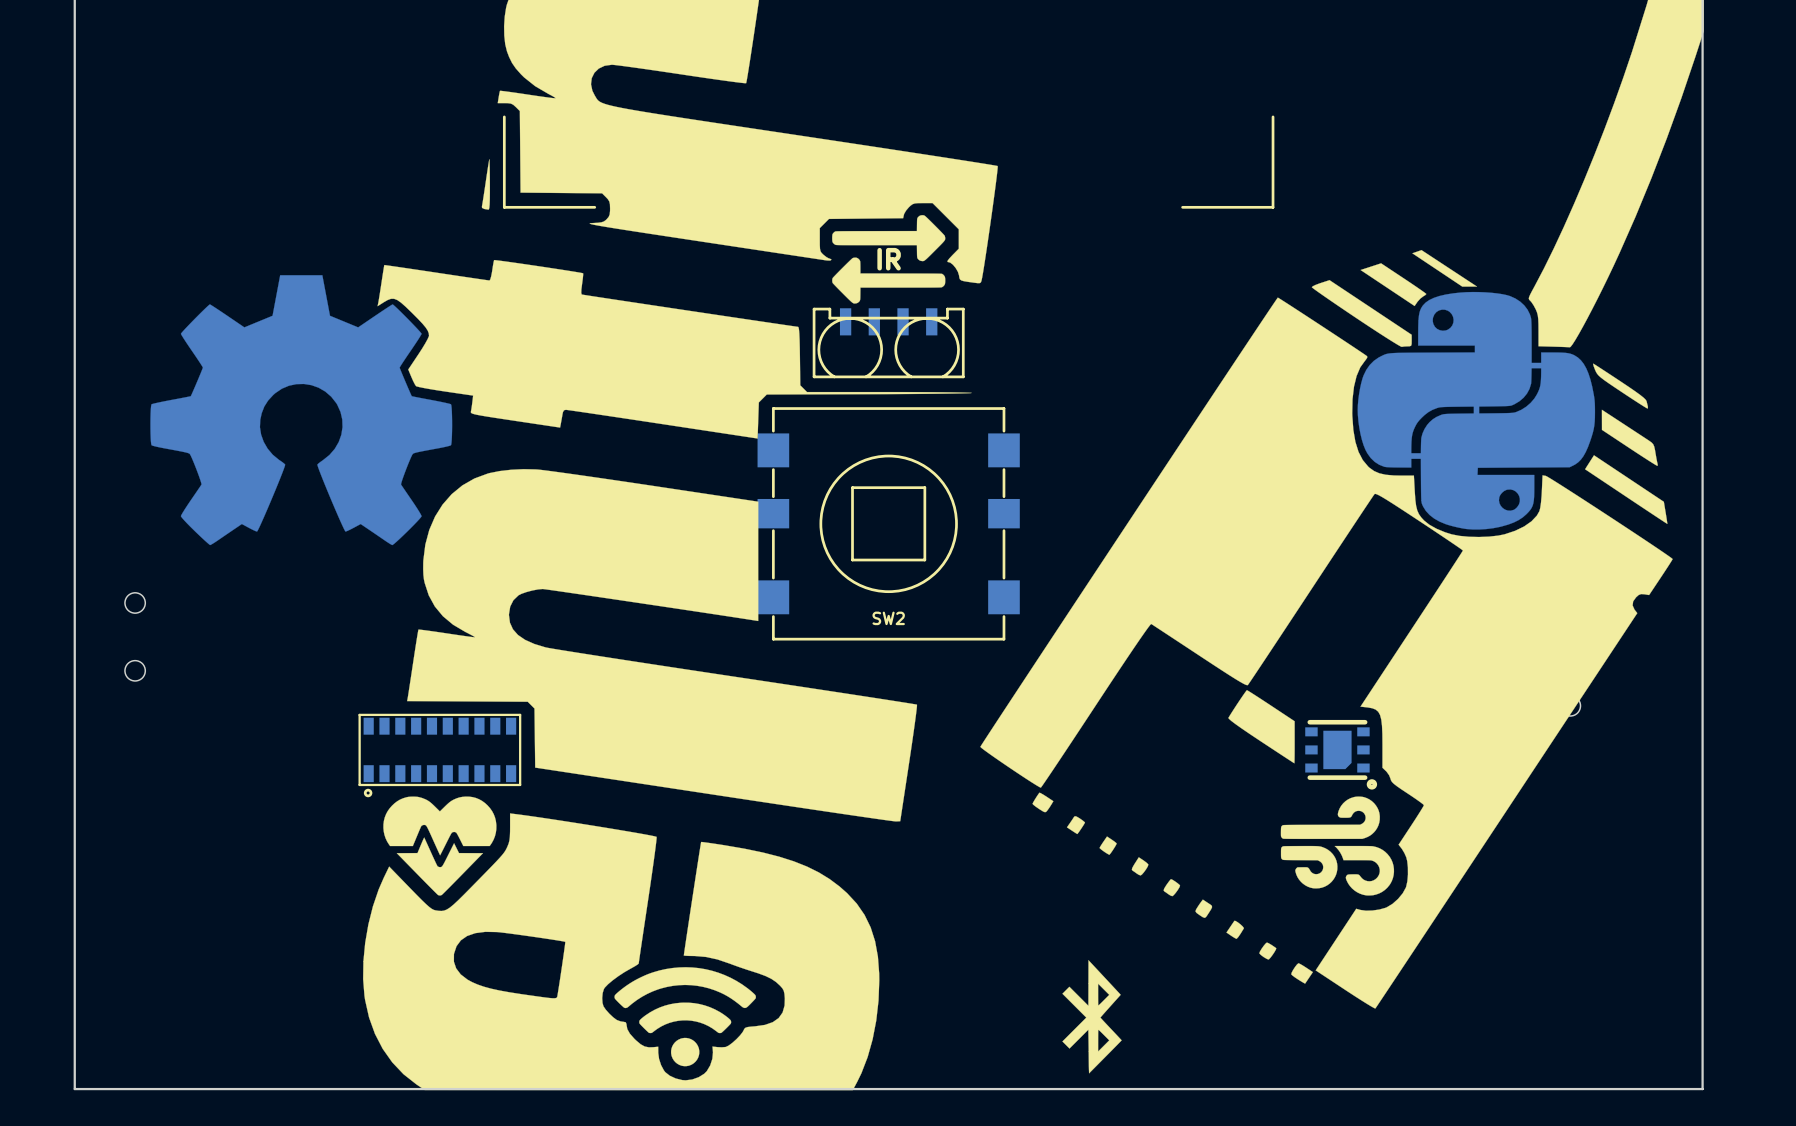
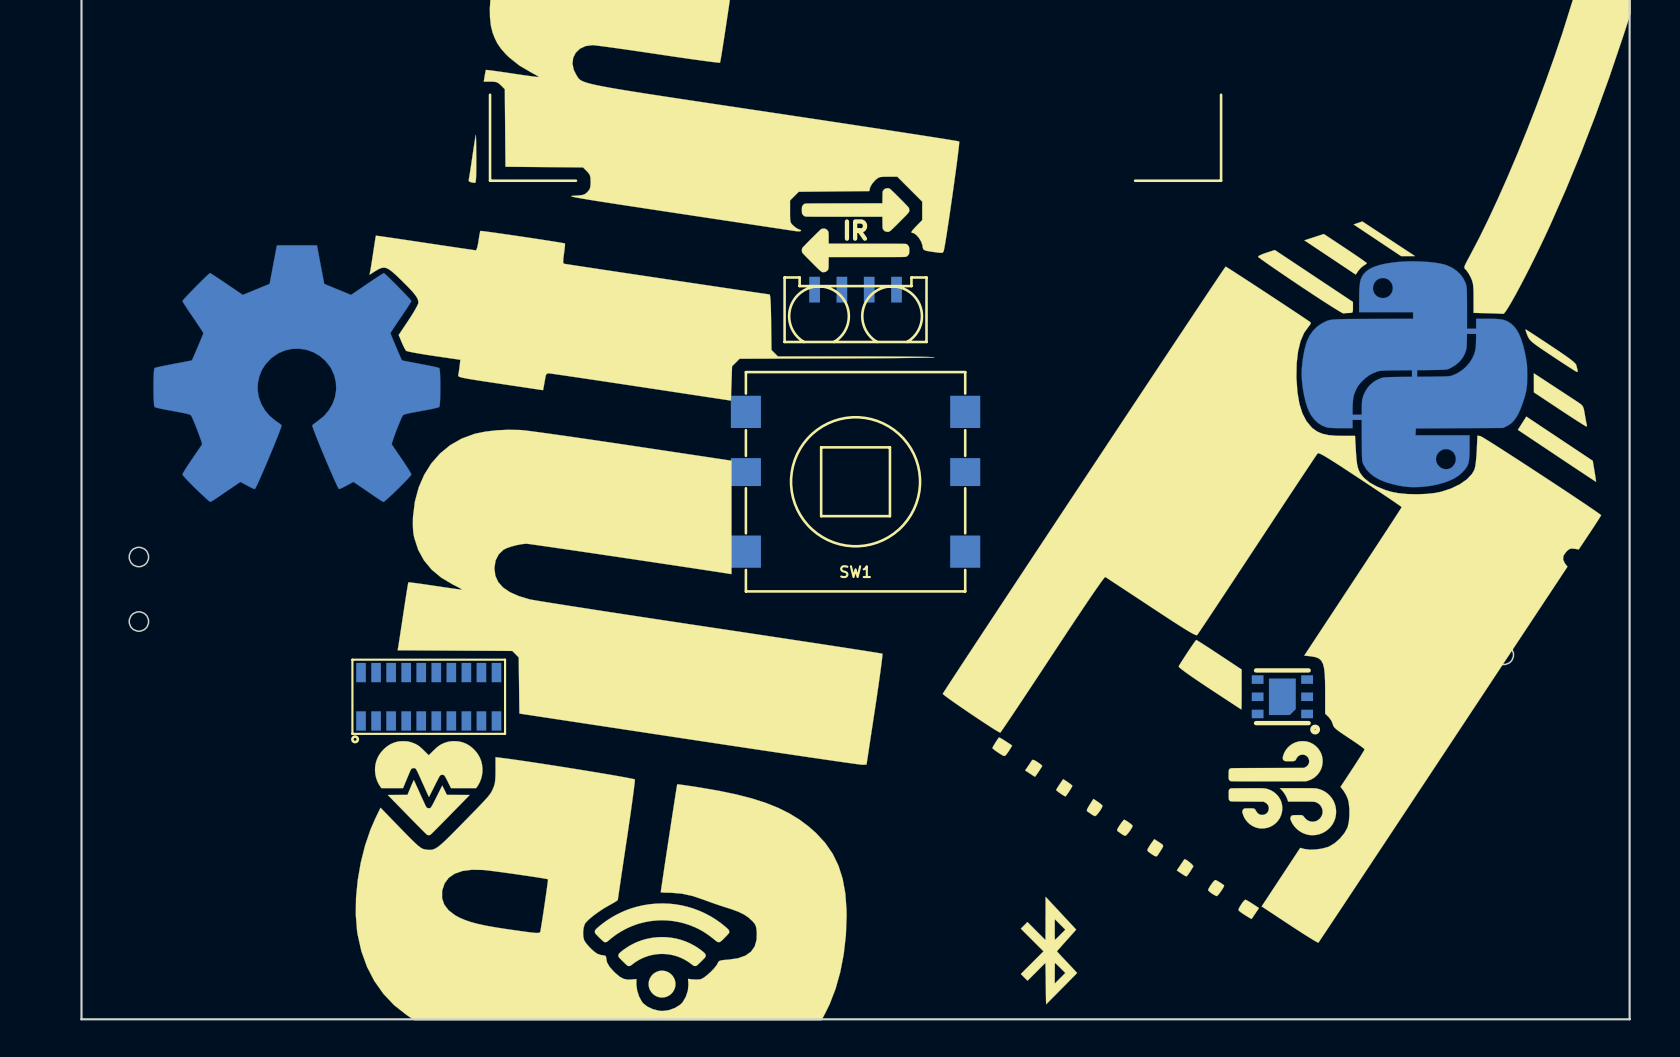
SW2 name: SW2 (888, 618) -> SW1 (855, 571)
part footprint: [358, 713, 522, 798] -> [351, 658, 507, 744]

